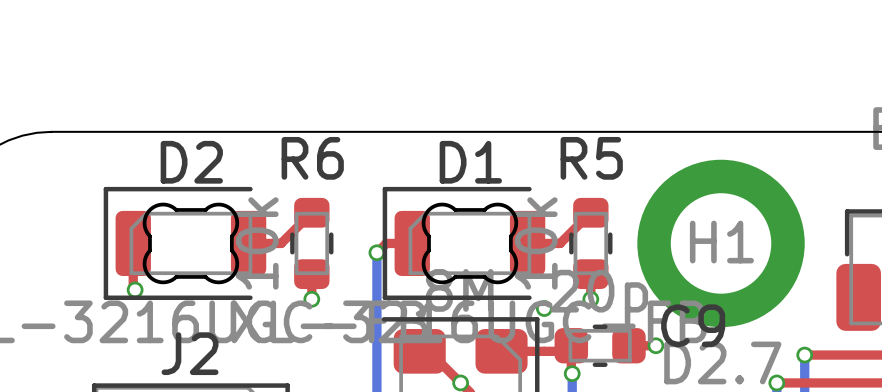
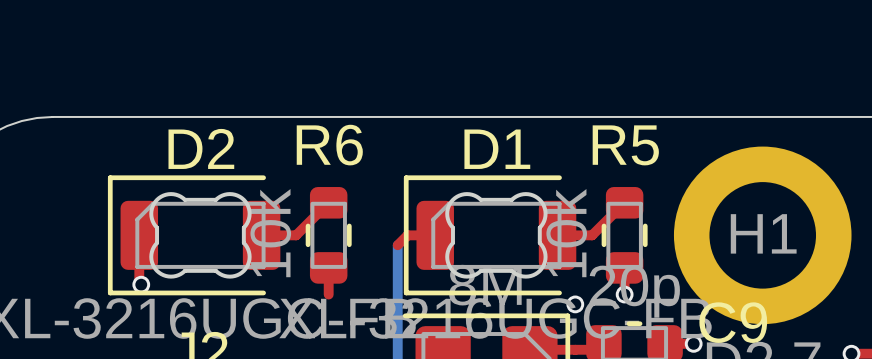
via: (376, 252) -> none
via: (311, 299) -> none

